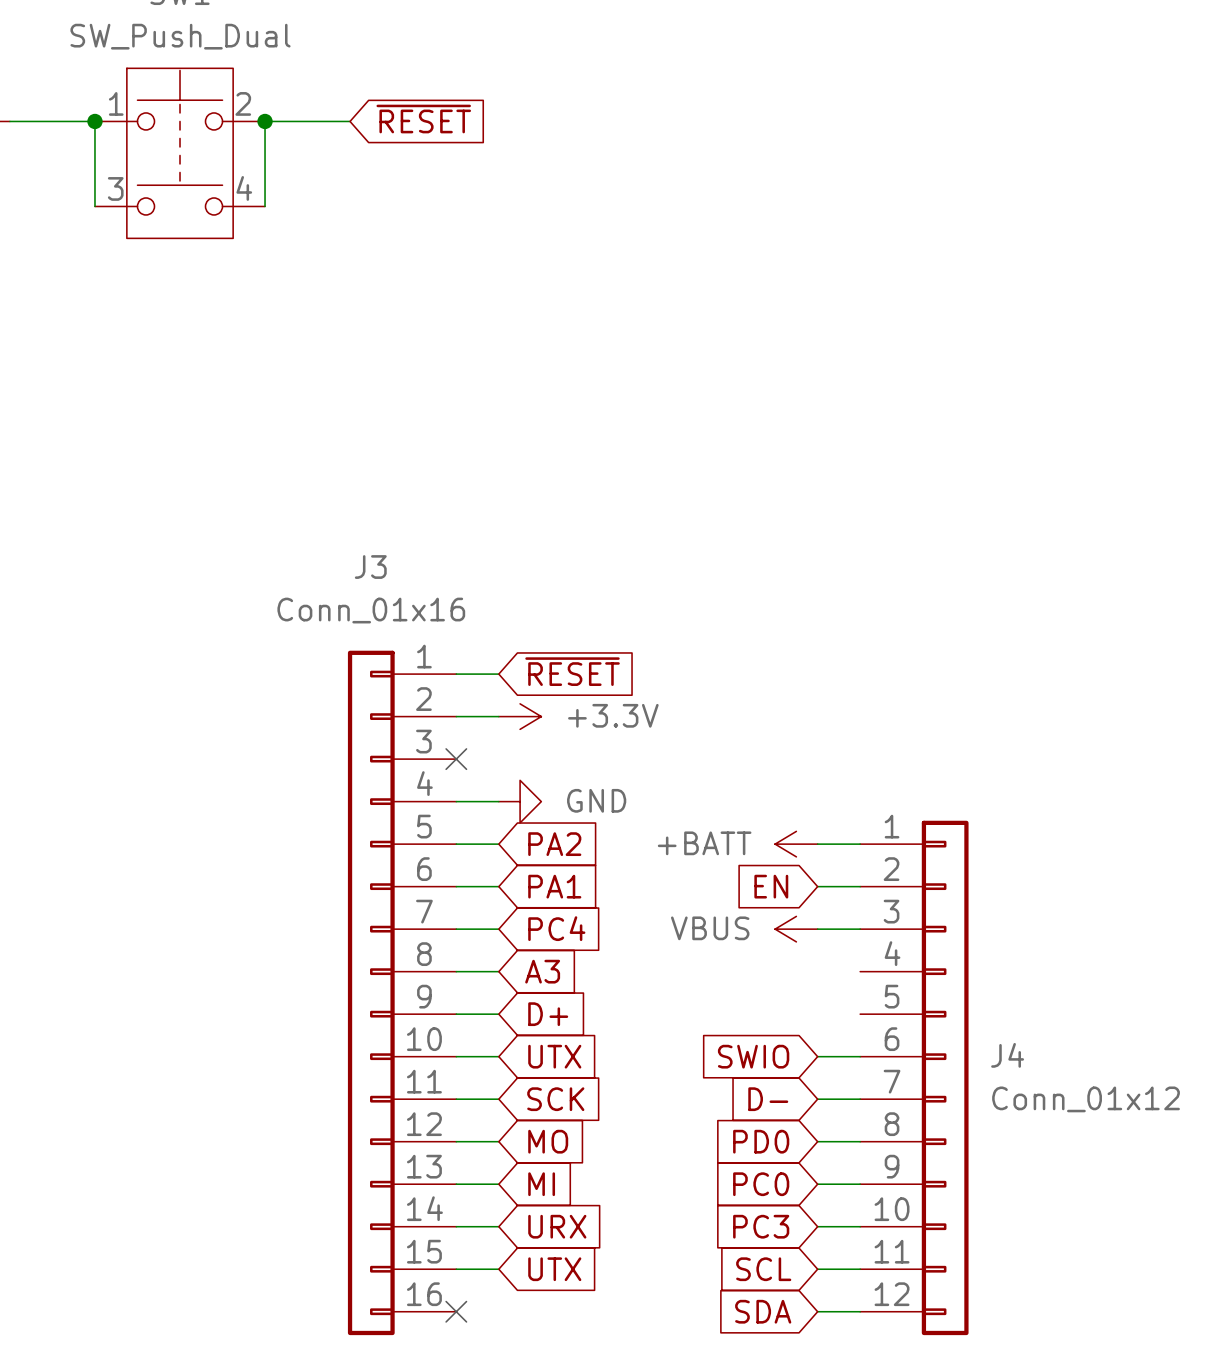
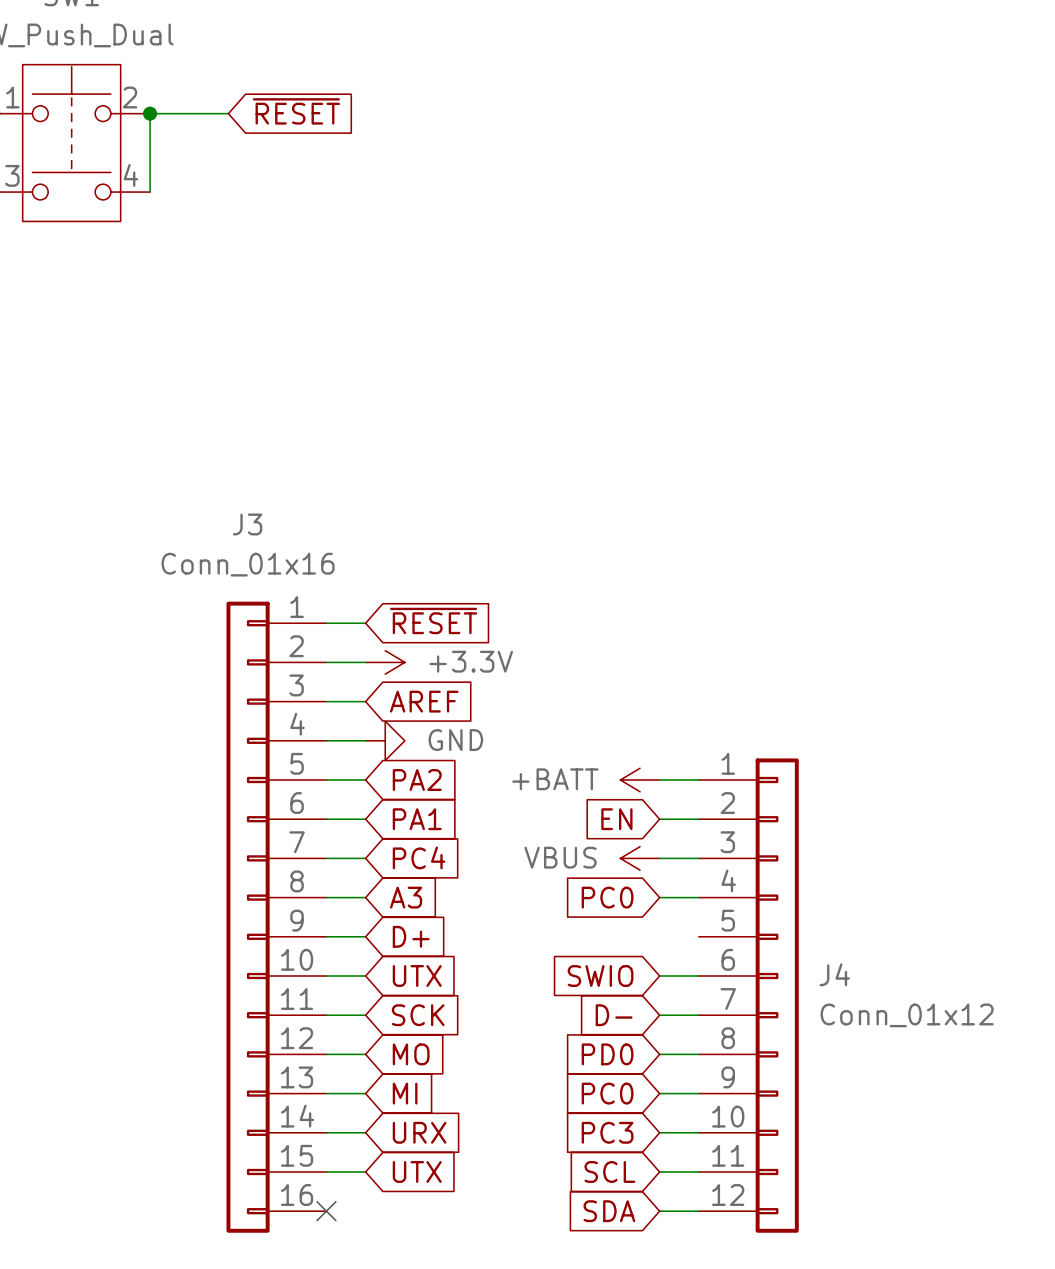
wire: none -> (326, 701) (365, 701)
no-connect mark: (456, 759) -> none
global label: none -> AREF (424, 701)
global label: none -> PC0 (607, 897)
wire: none -> (659, 897) (698, 897)

